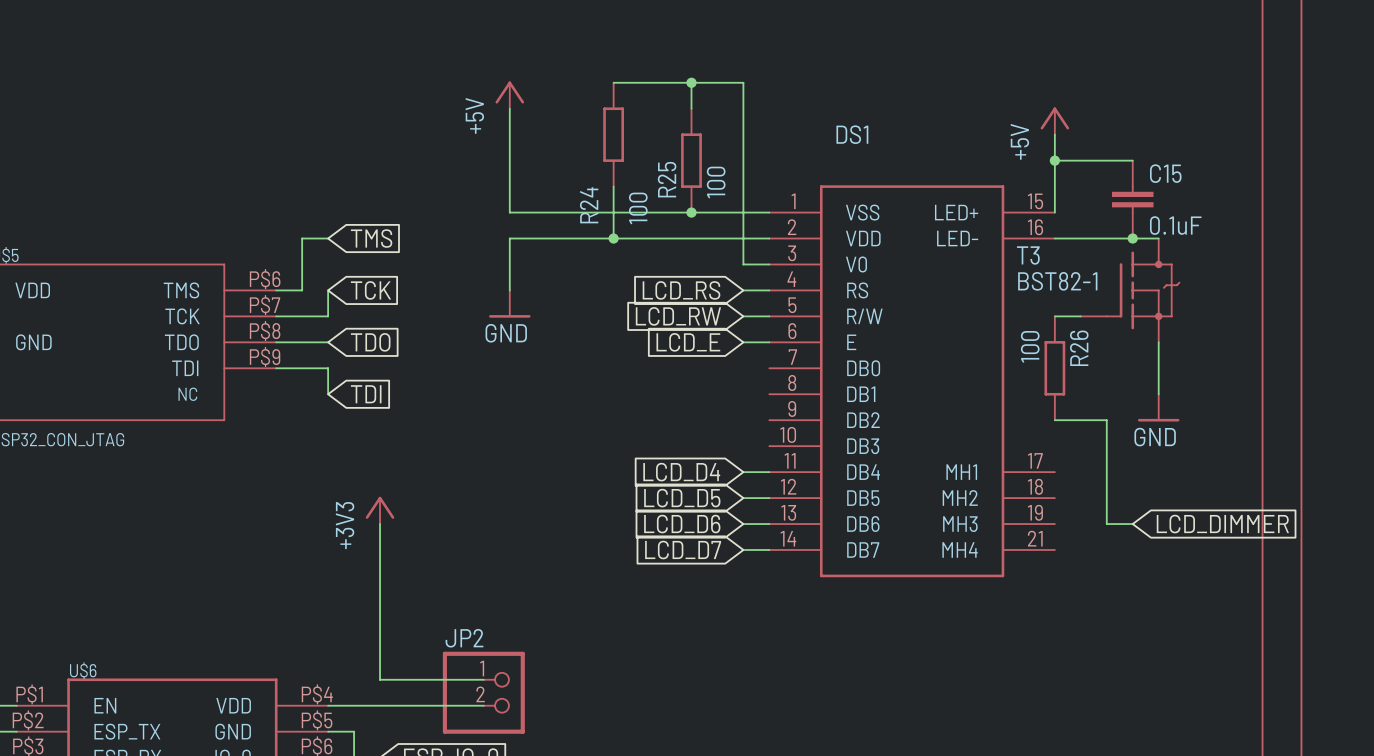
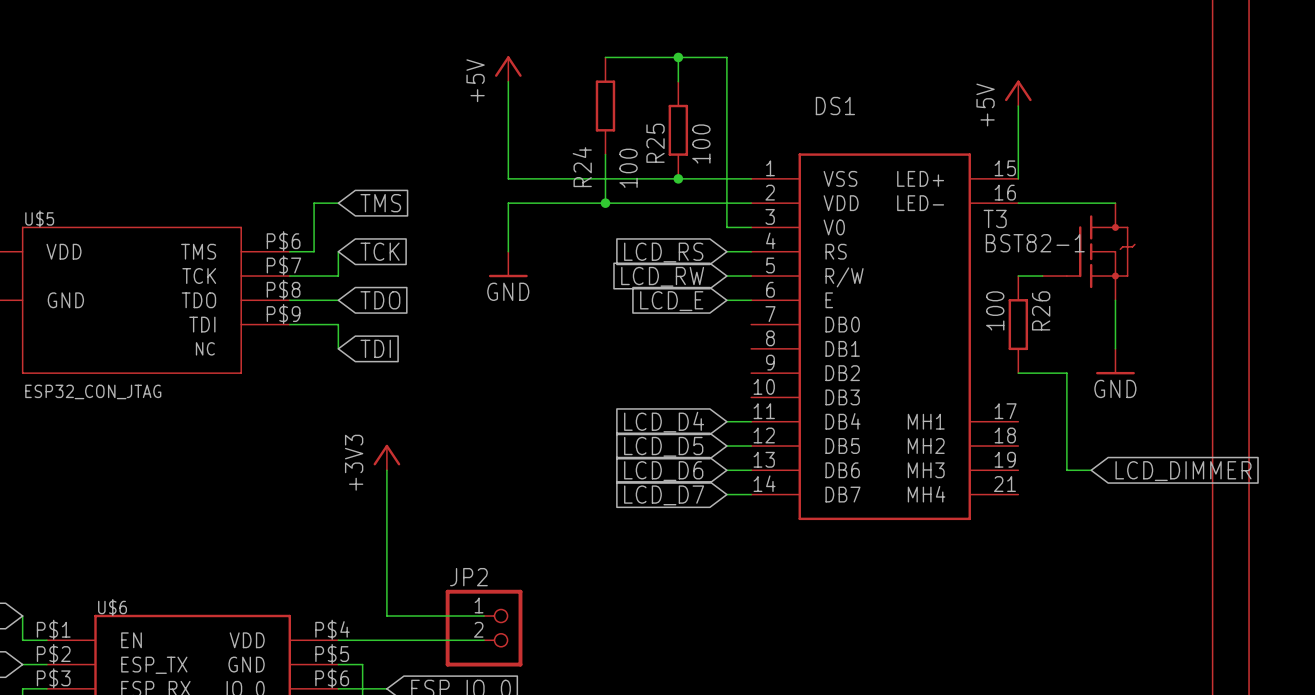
wire: (1054, 160) (1132, 160) -> none
junction: (1054, 160) -> none
C15: 0.1uF (1132, 199) -> none
junction: (1132, 238) -> none

